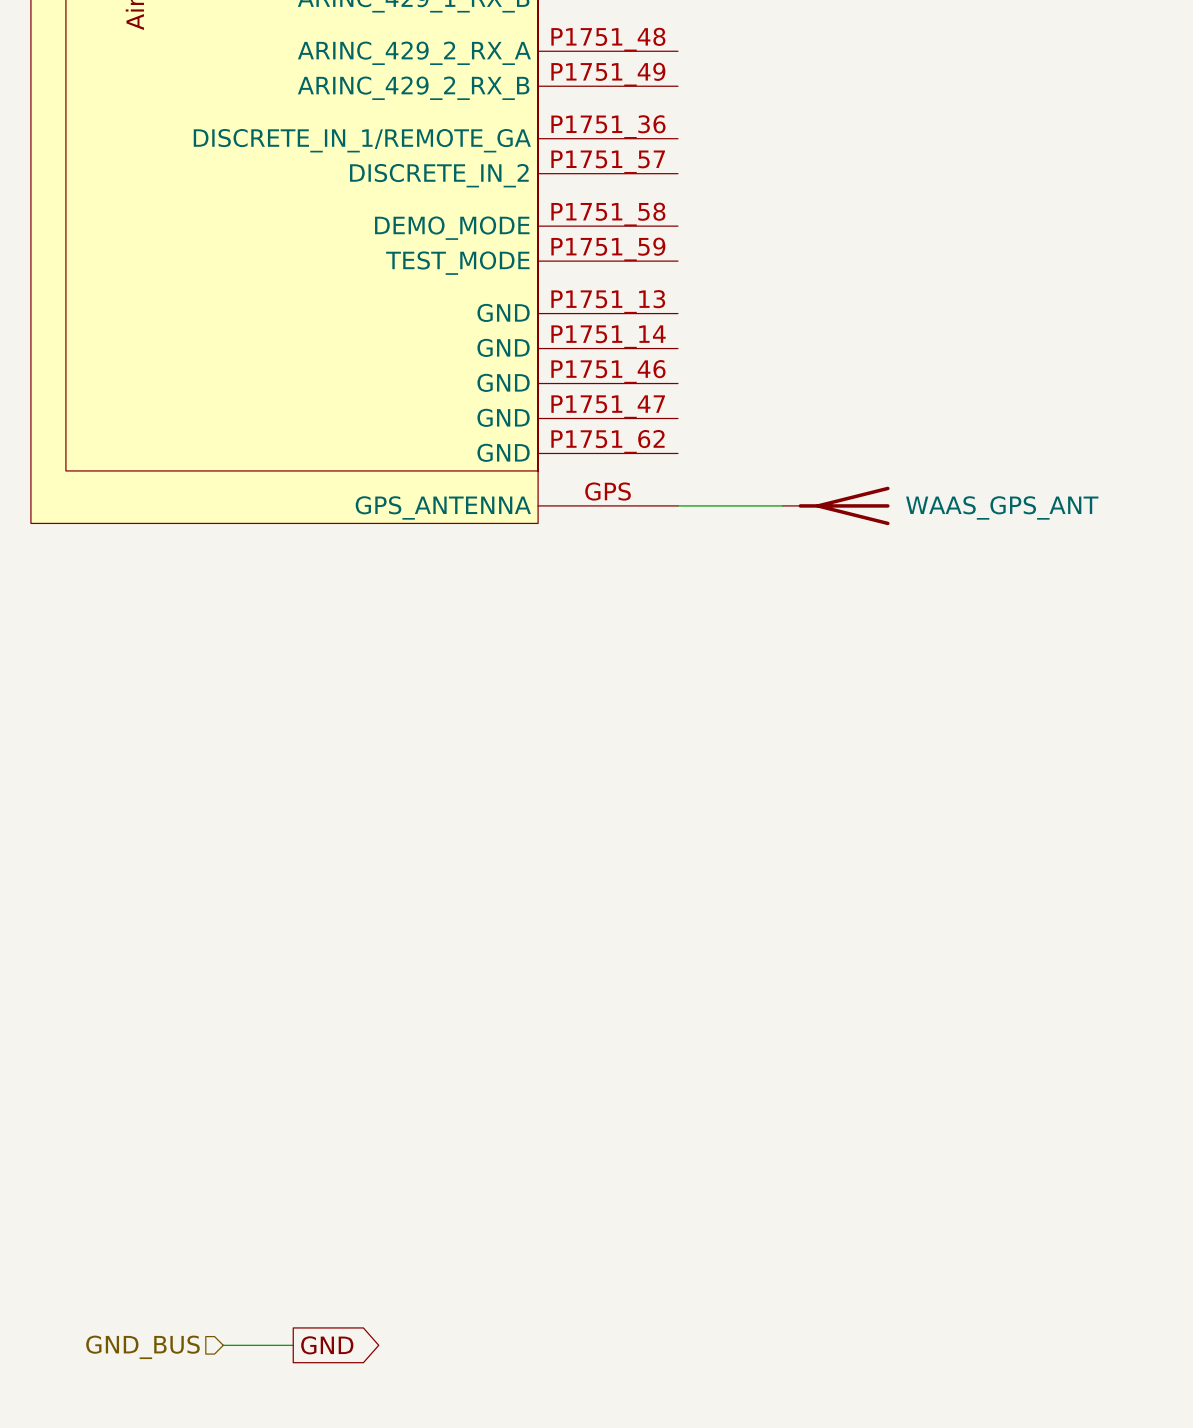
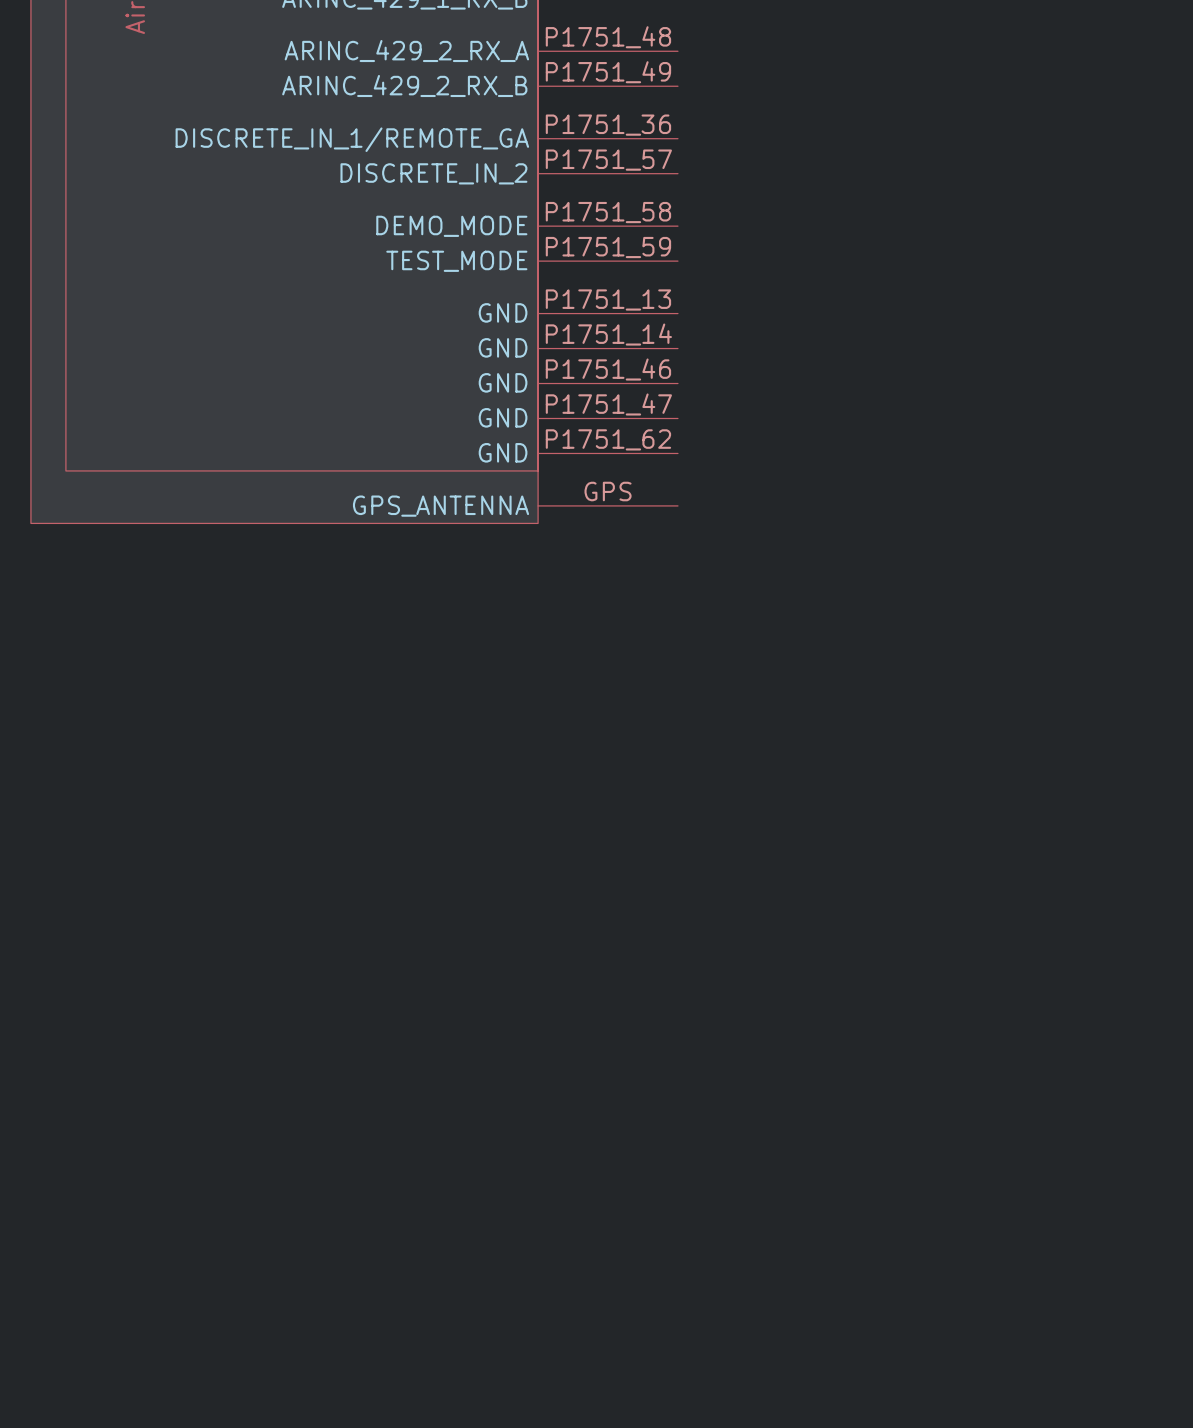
wire: (677, 505) (782, 505) -> none
WAAS_GPS_ANT: (836, 505) -> none
wire: (223, 1345) (293, 1345) -> none
global label: GND (327, 1345) -> none
hierarchical label: GND_BUS (142, 1347) -> none

